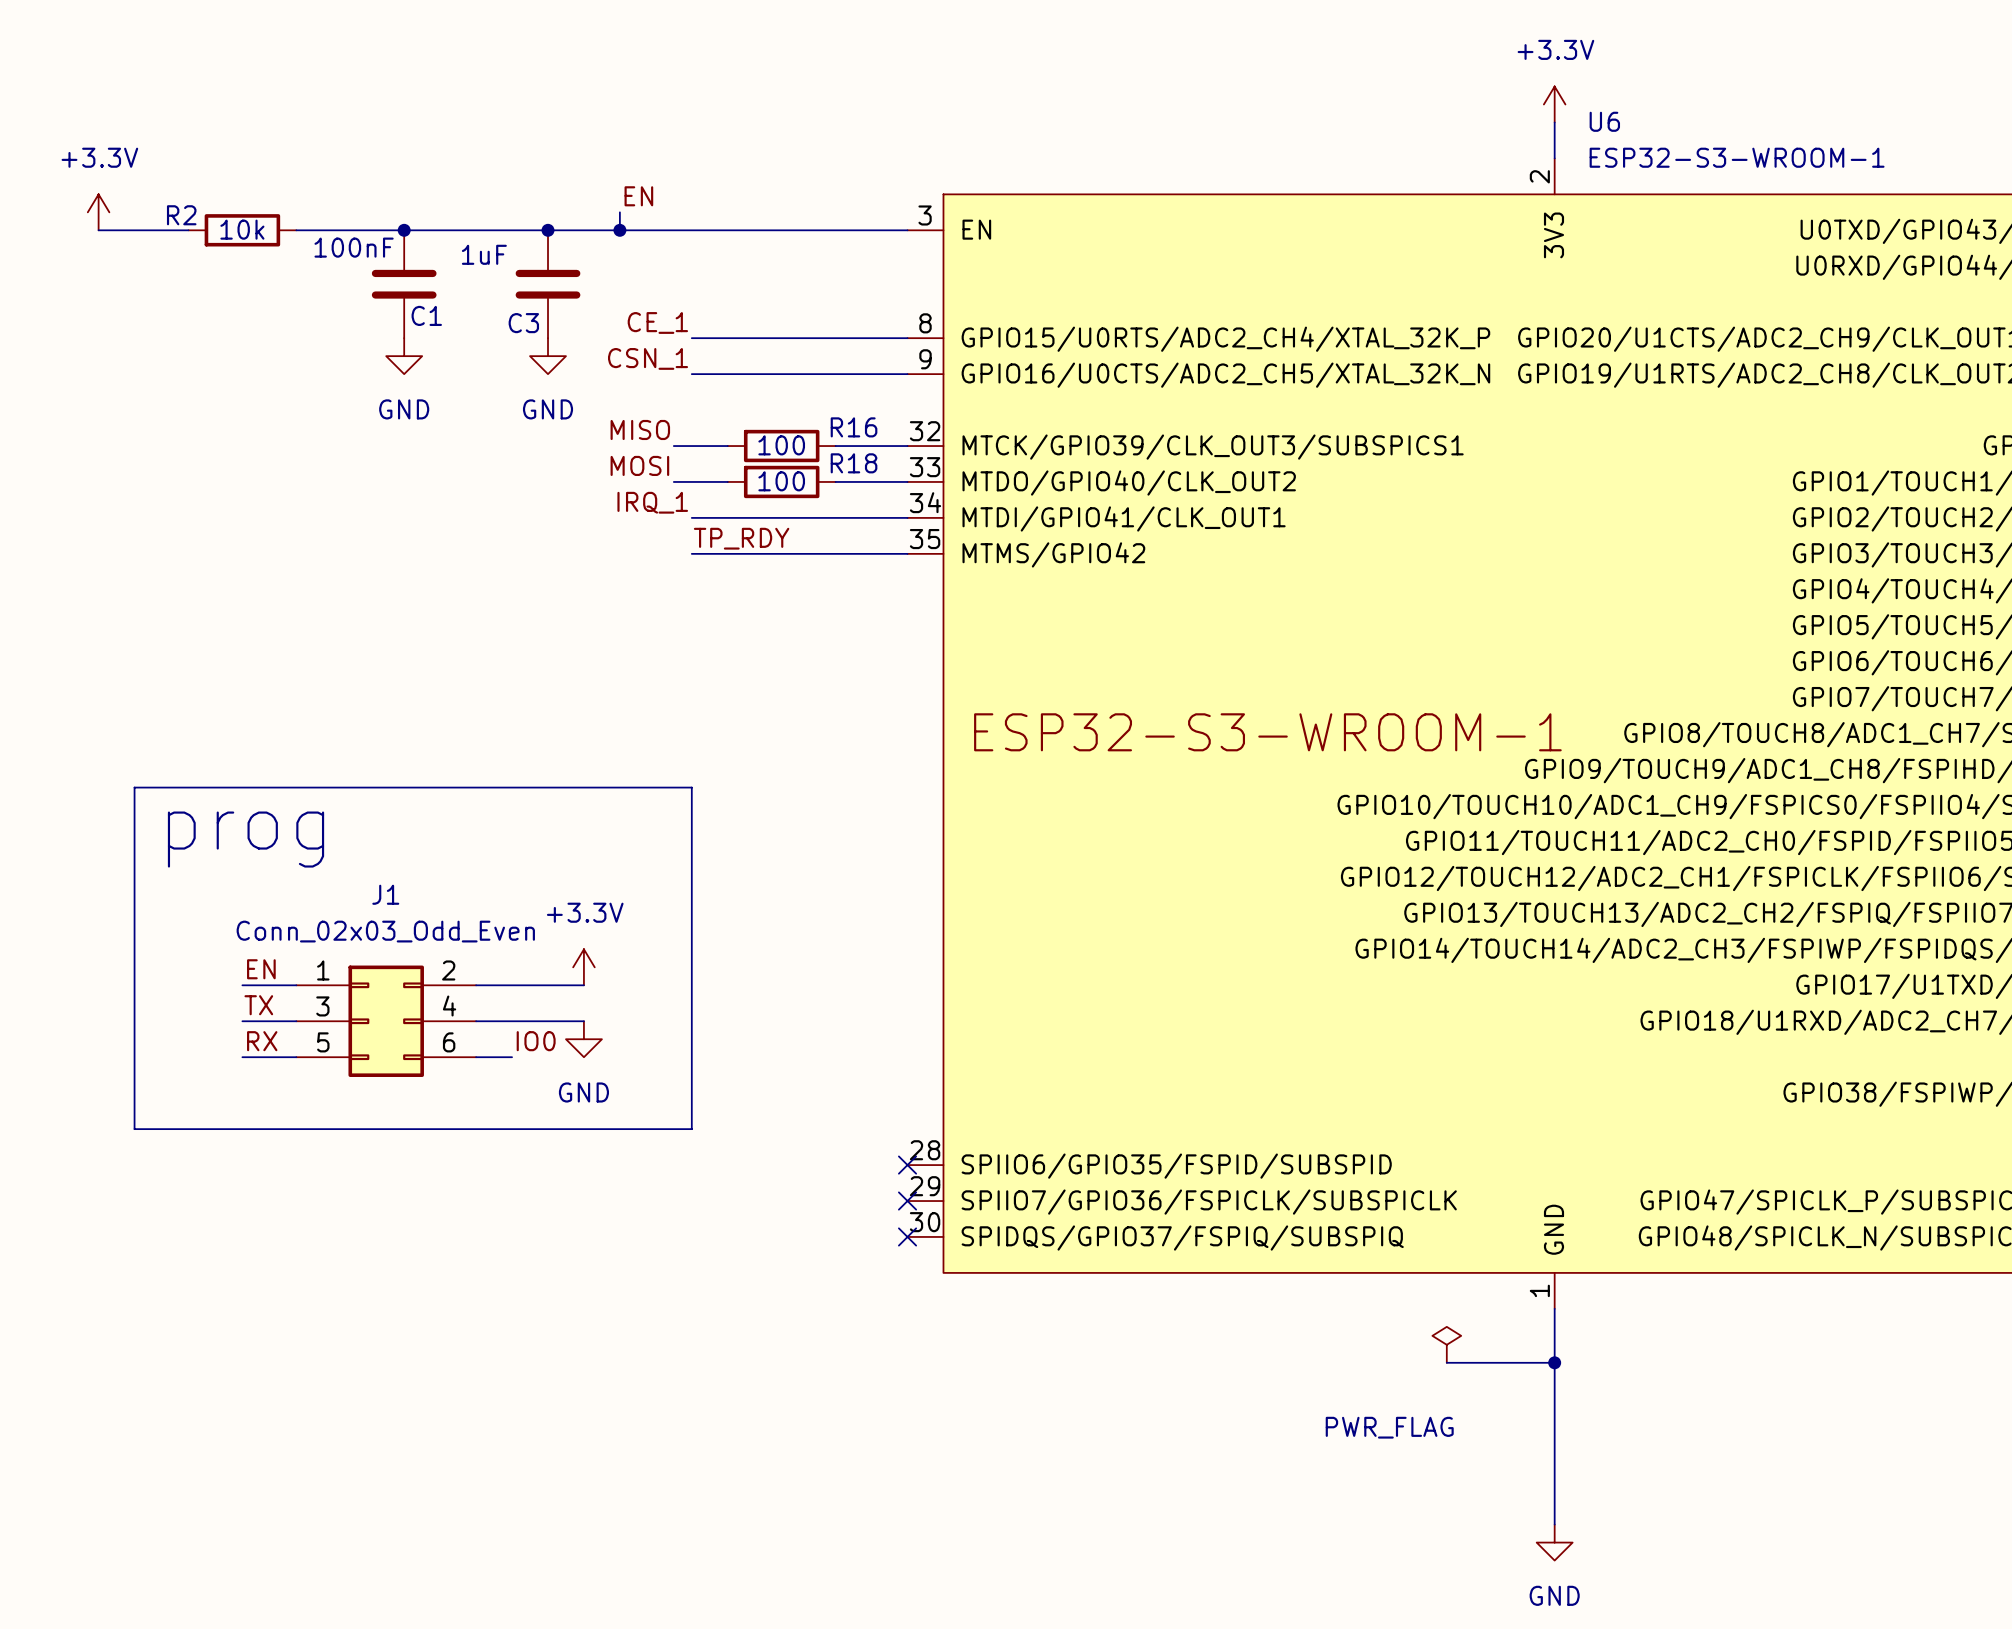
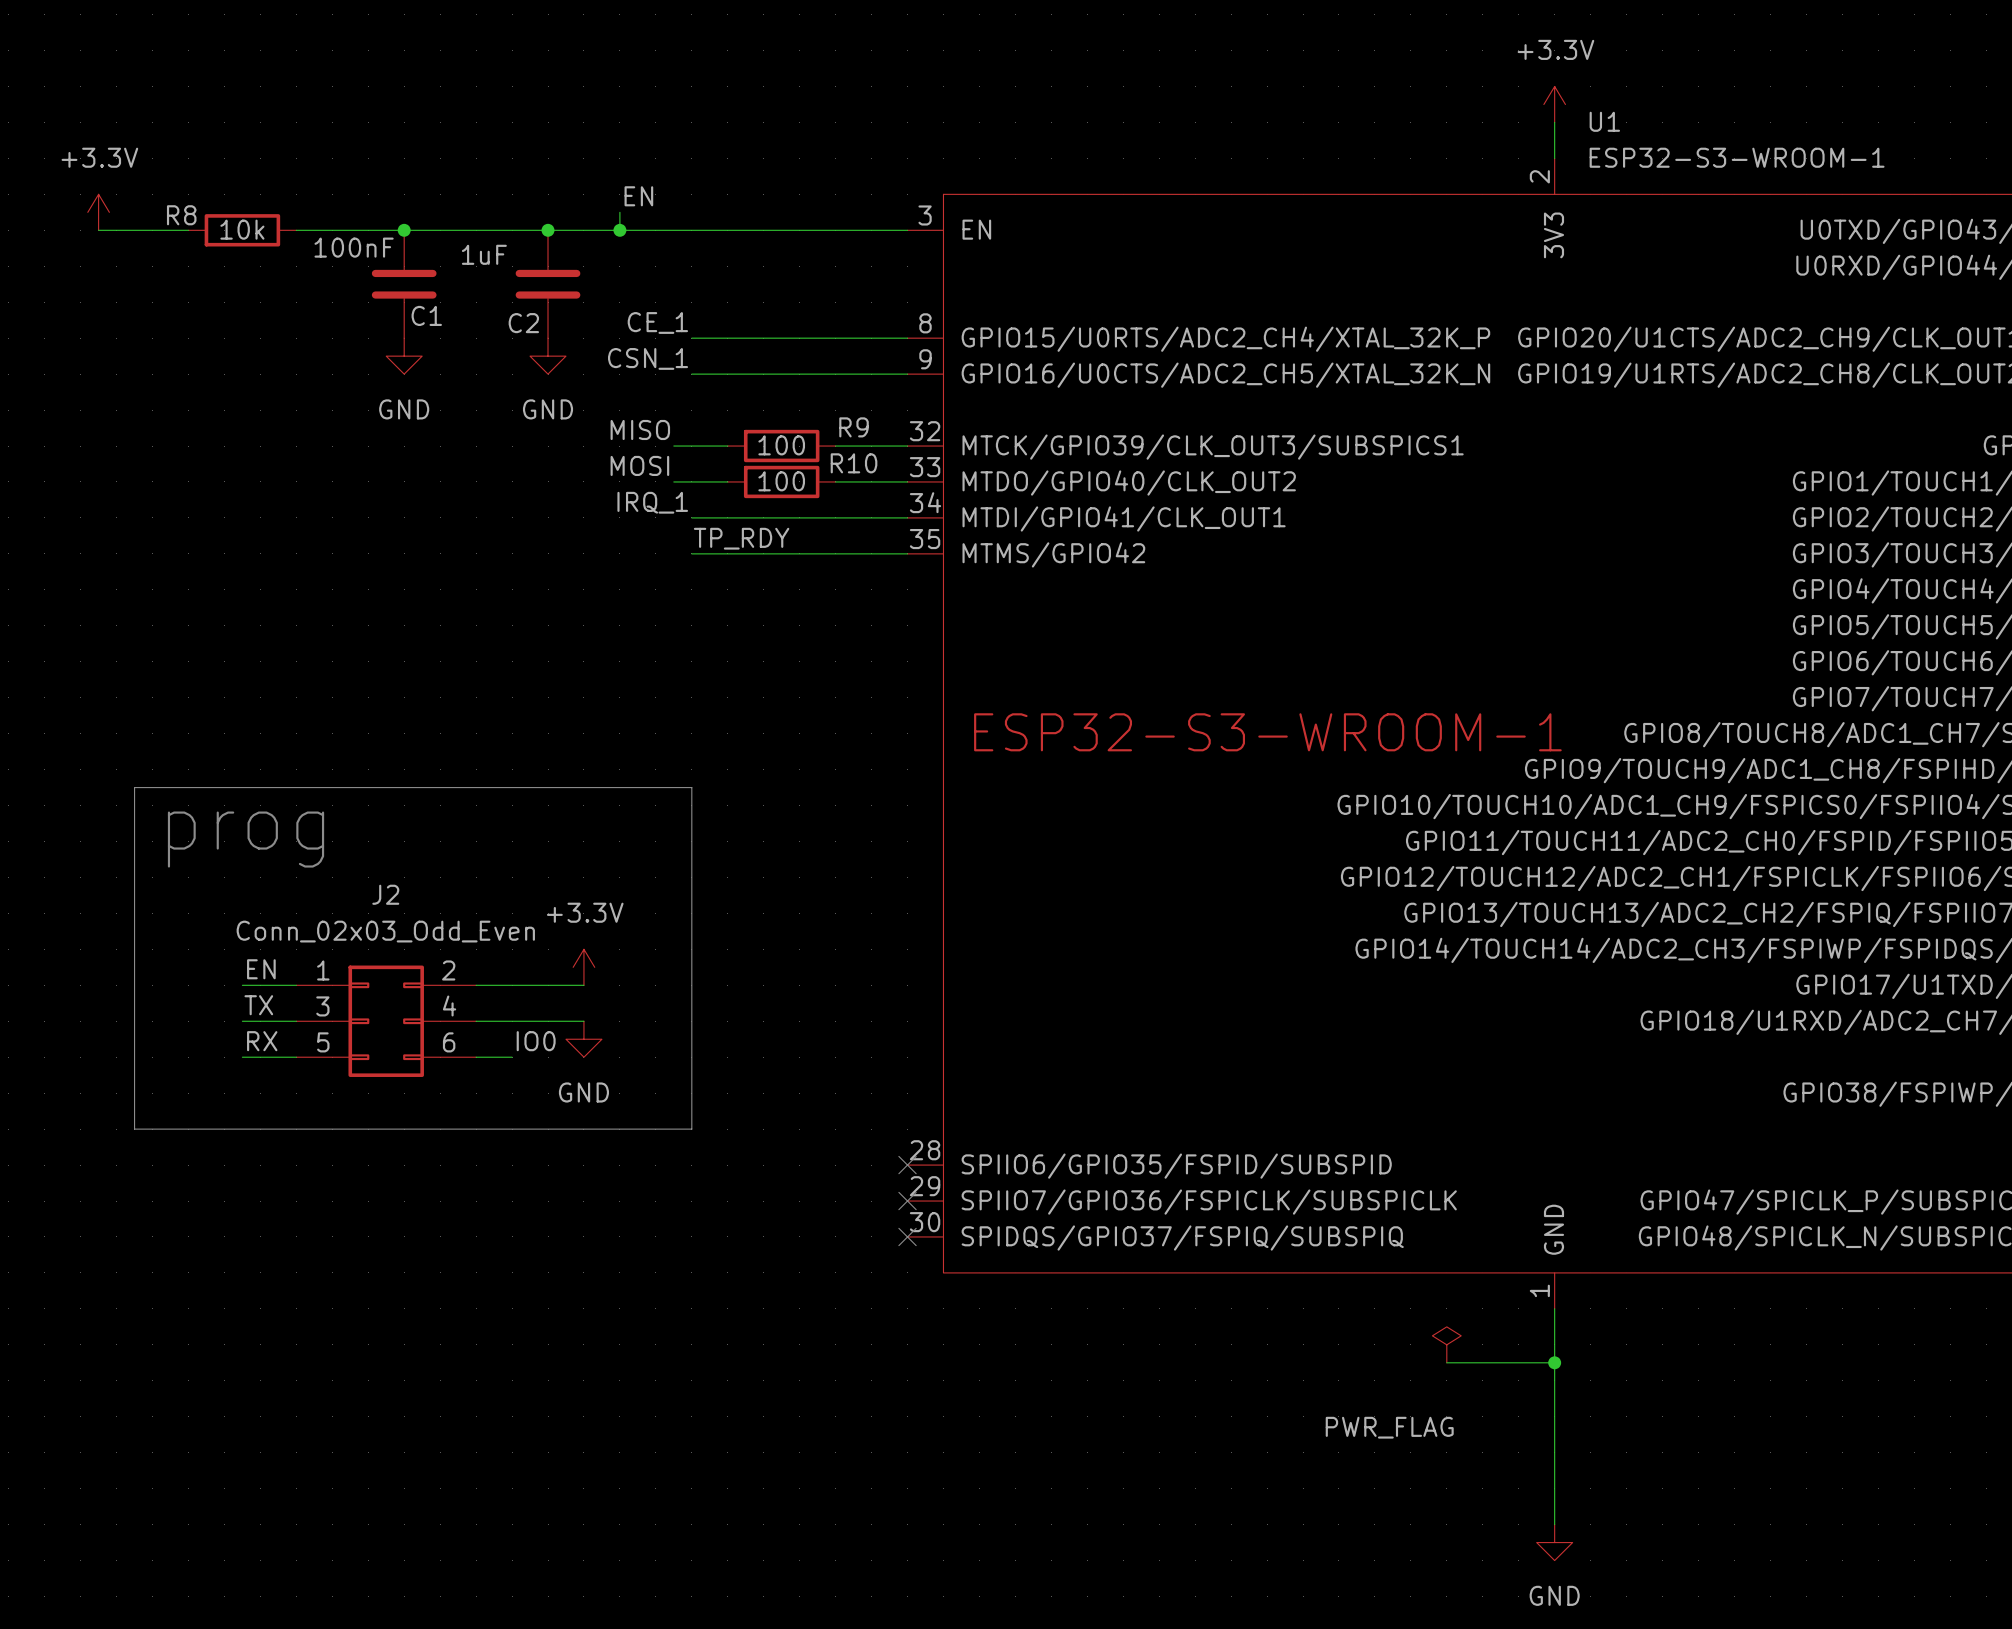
U6 name: U6 (1604, 121) -> U1 (1604, 121)
R2 name: R2 (181, 215) -> R8 (181, 215)
C3 name: C3 (523, 323) -> C2 (523, 323)
R16 name: R16 (854, 427) -> R9 (854, 427)
R18 name: R18 (854, 463) -> R10 (854, 463)
J1 name: J1 (385, 894) -> J2 (385, 894)

